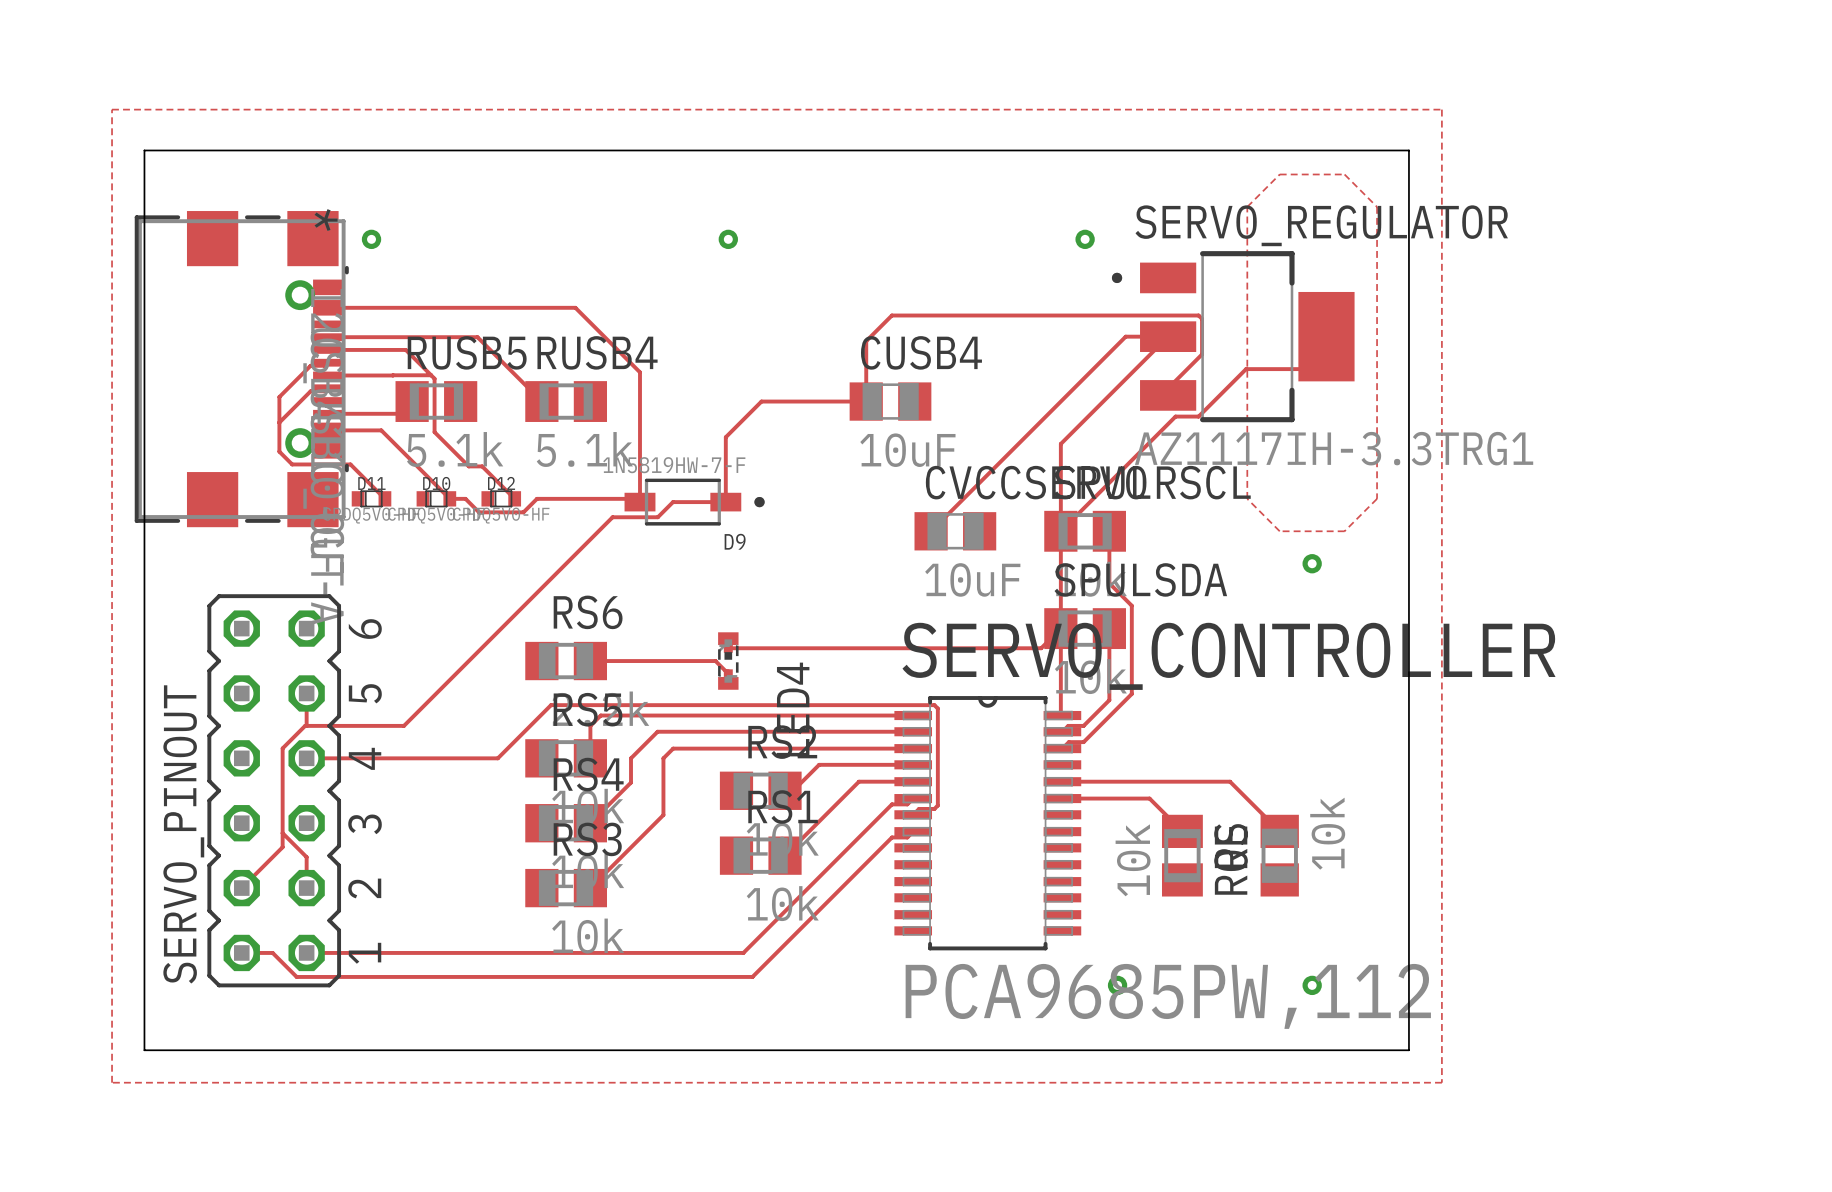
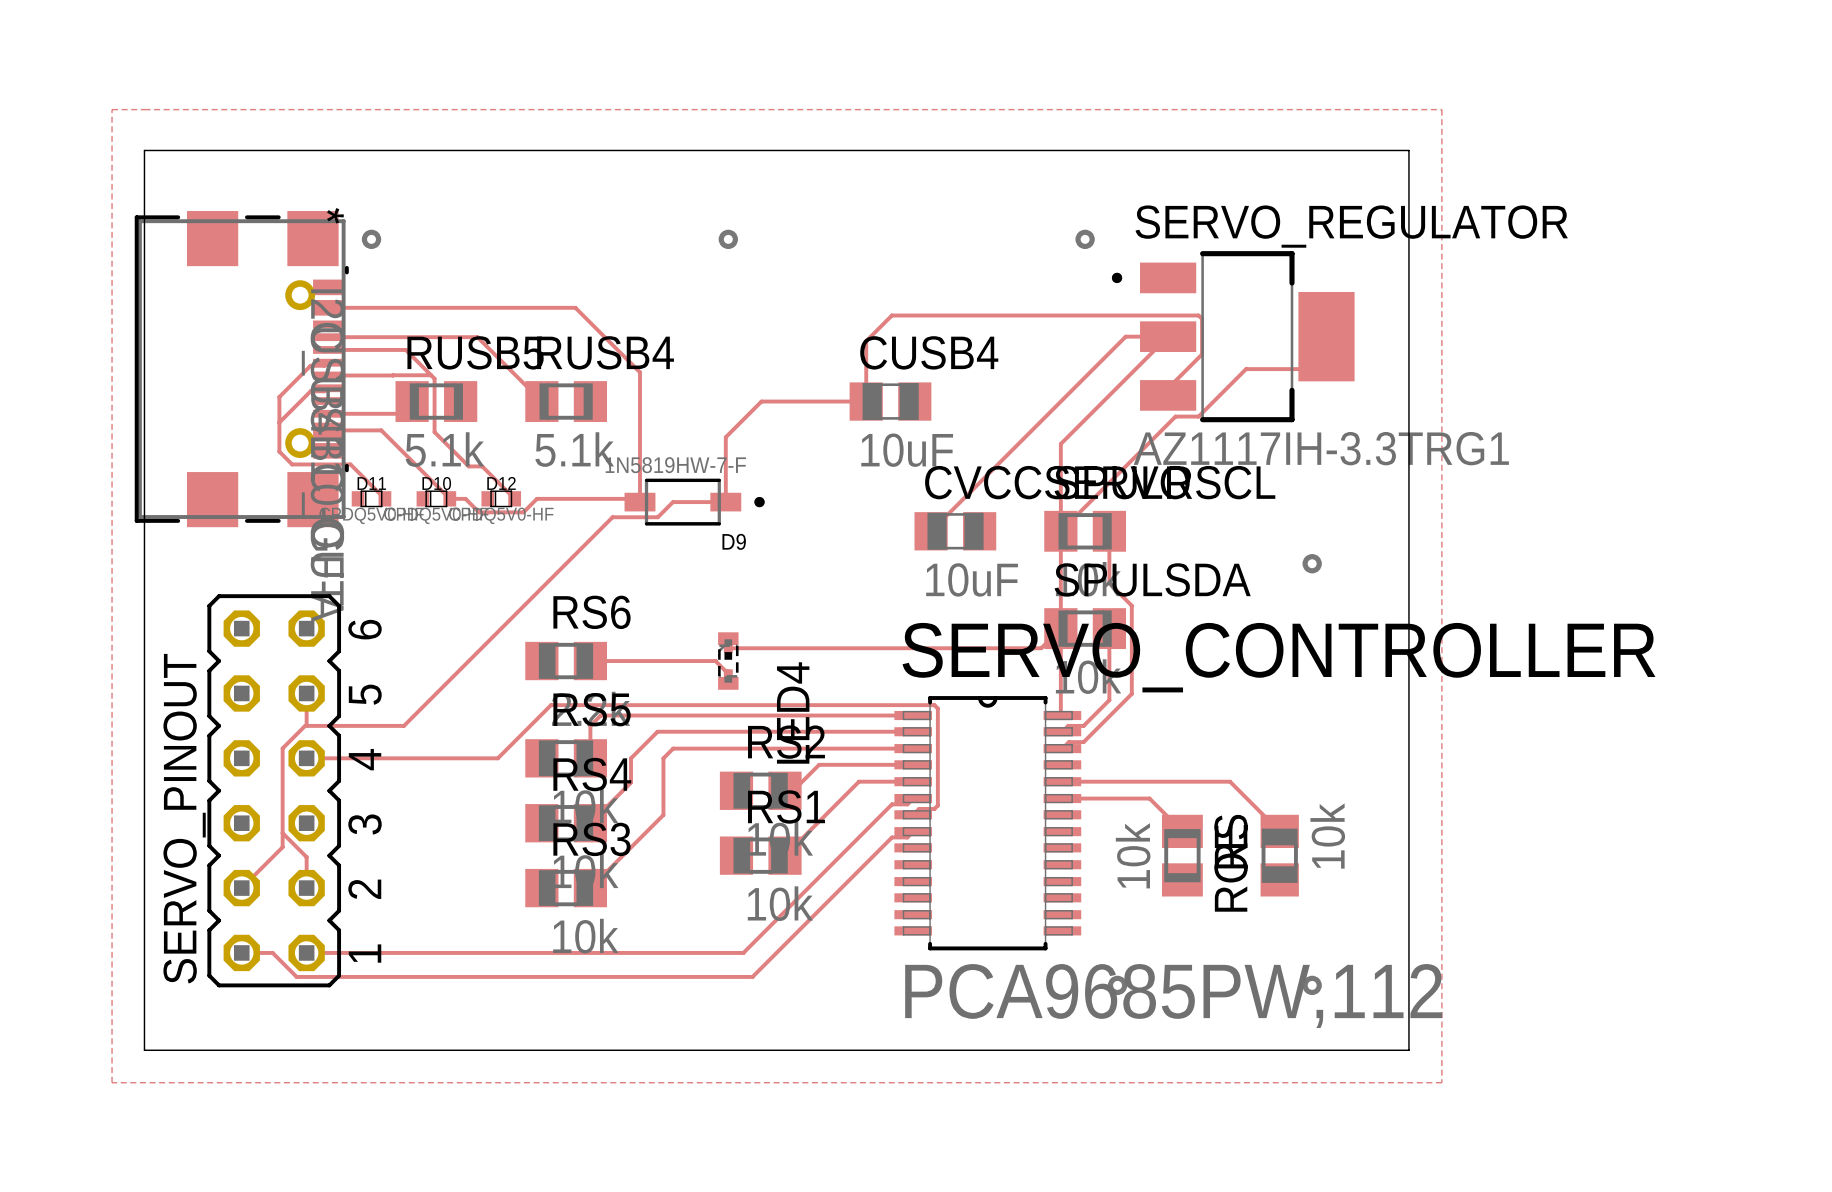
zone outline: (1279, 174) (1344, 174) (1377, 206) (1377, 498) (1344, 531) (1279, 531) (1247, 498) (1247, 206) (1279, 174) -> none

